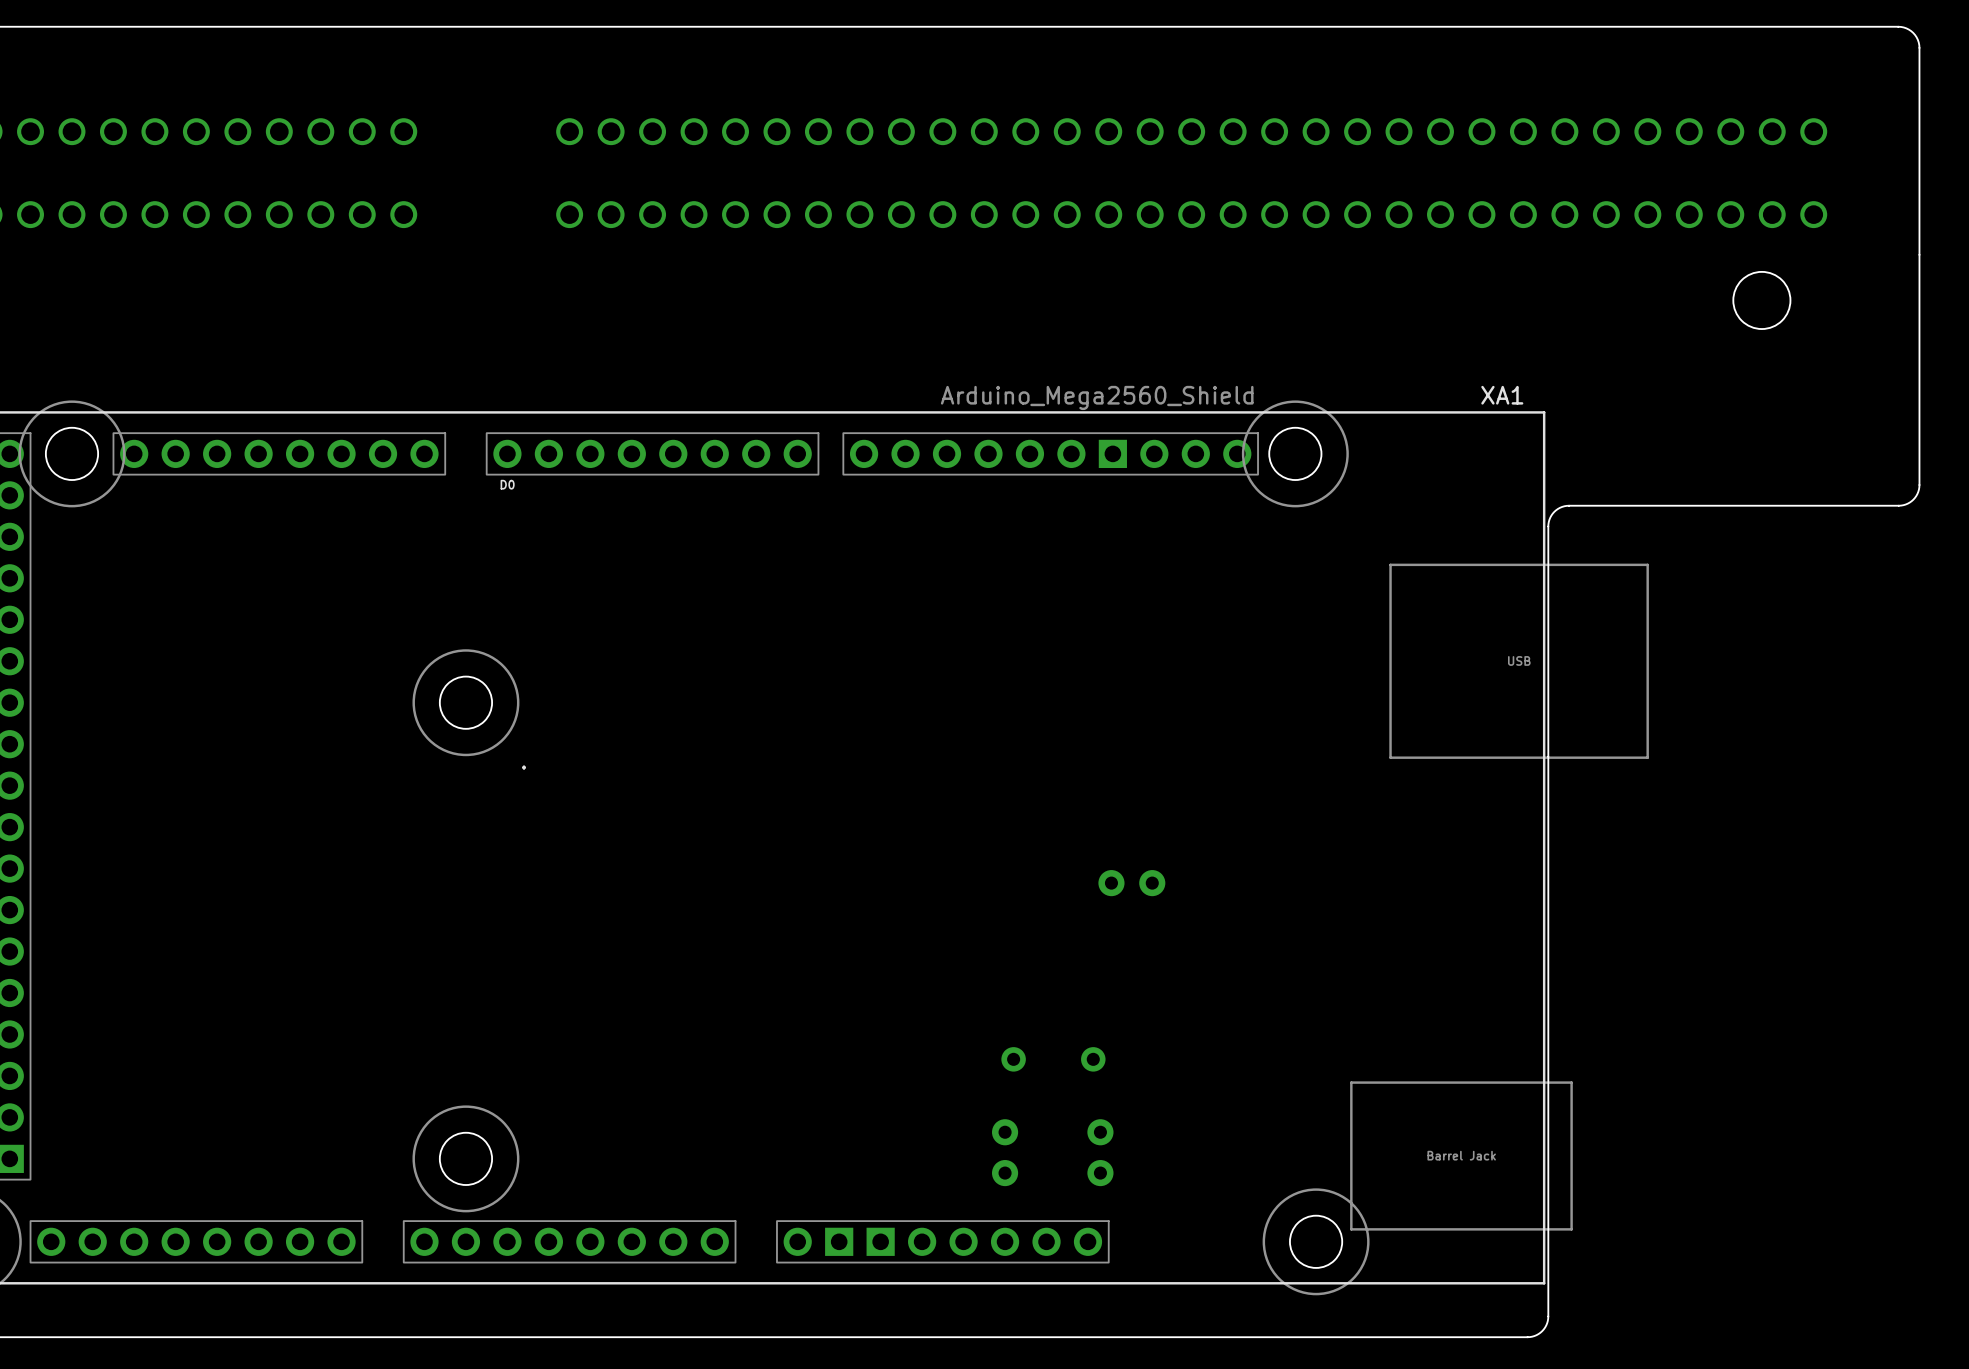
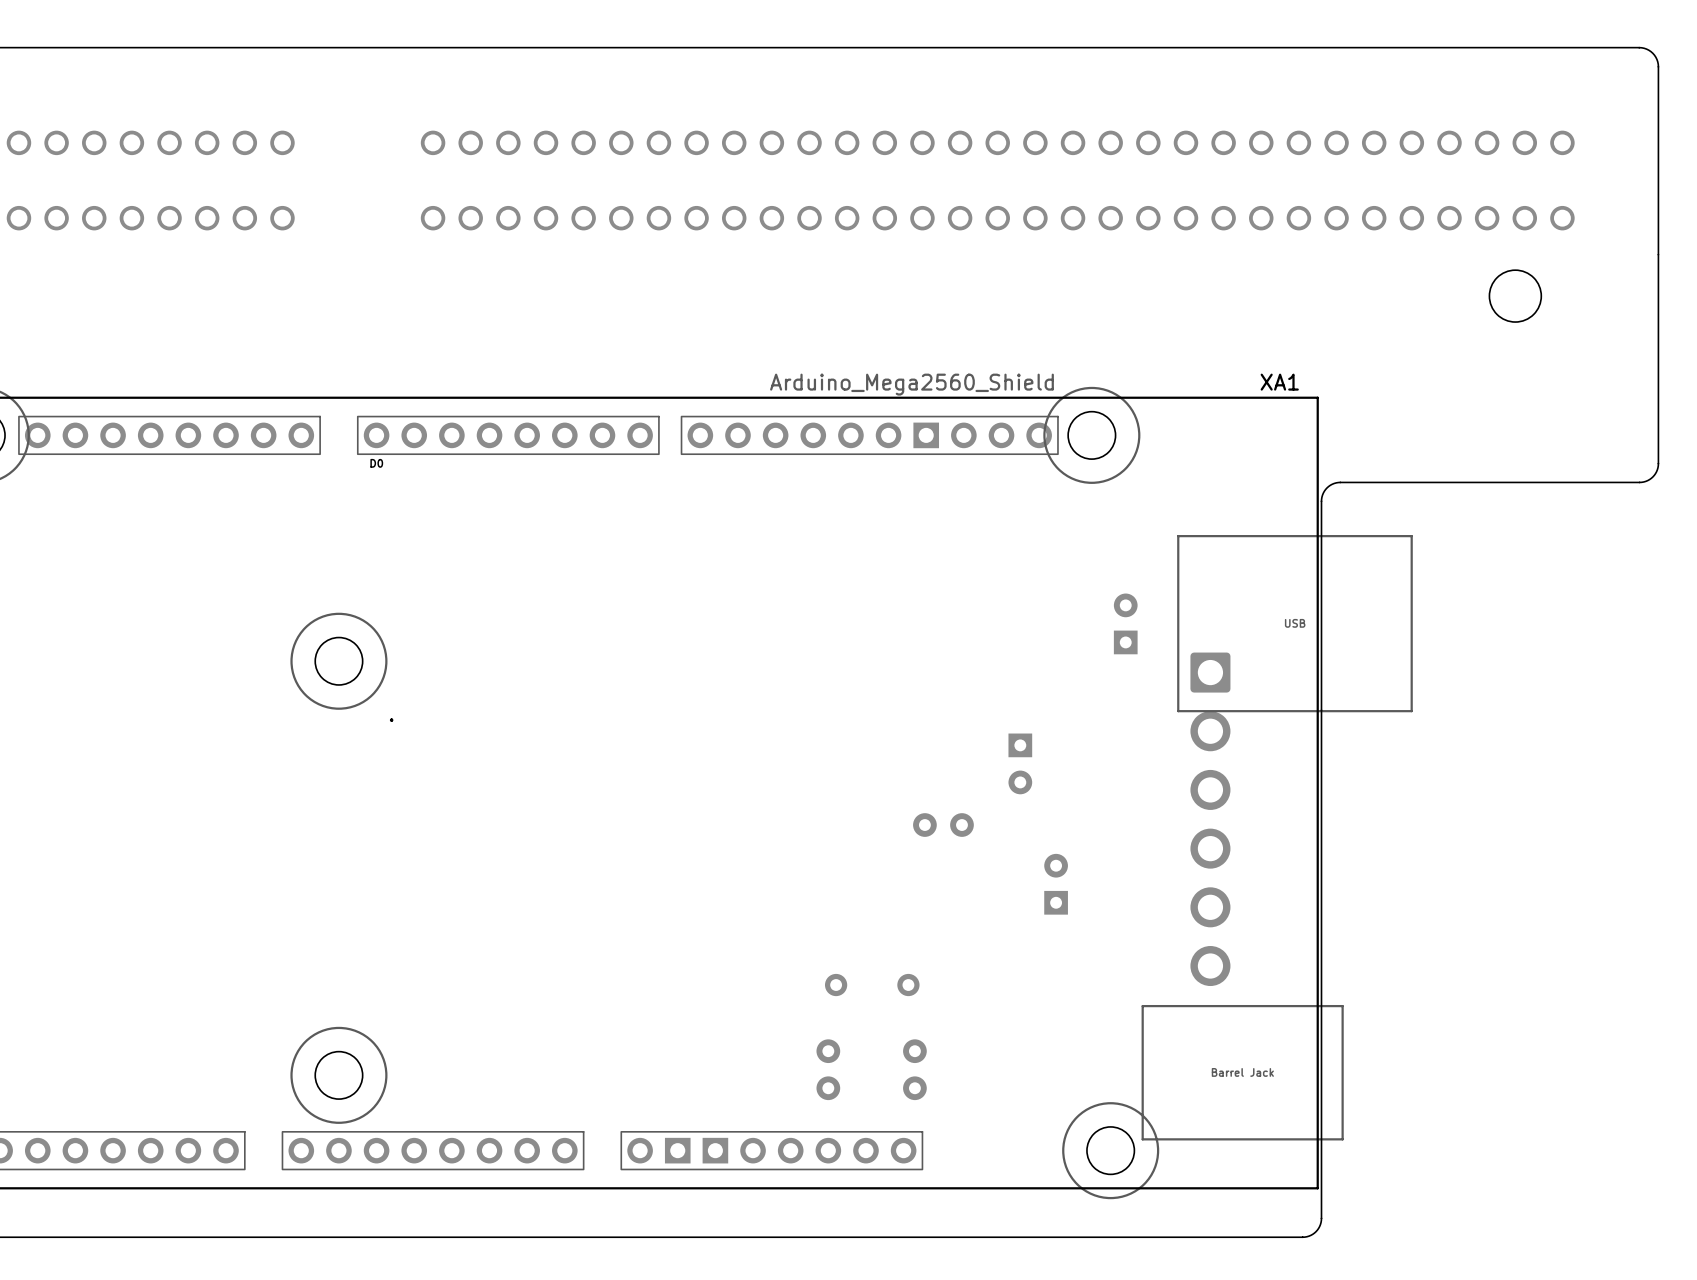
part: none -> (1125, 623)
part: none -> (1020, 763)
part: none -> (1210, 819)
part: none -> (1056, 884)

